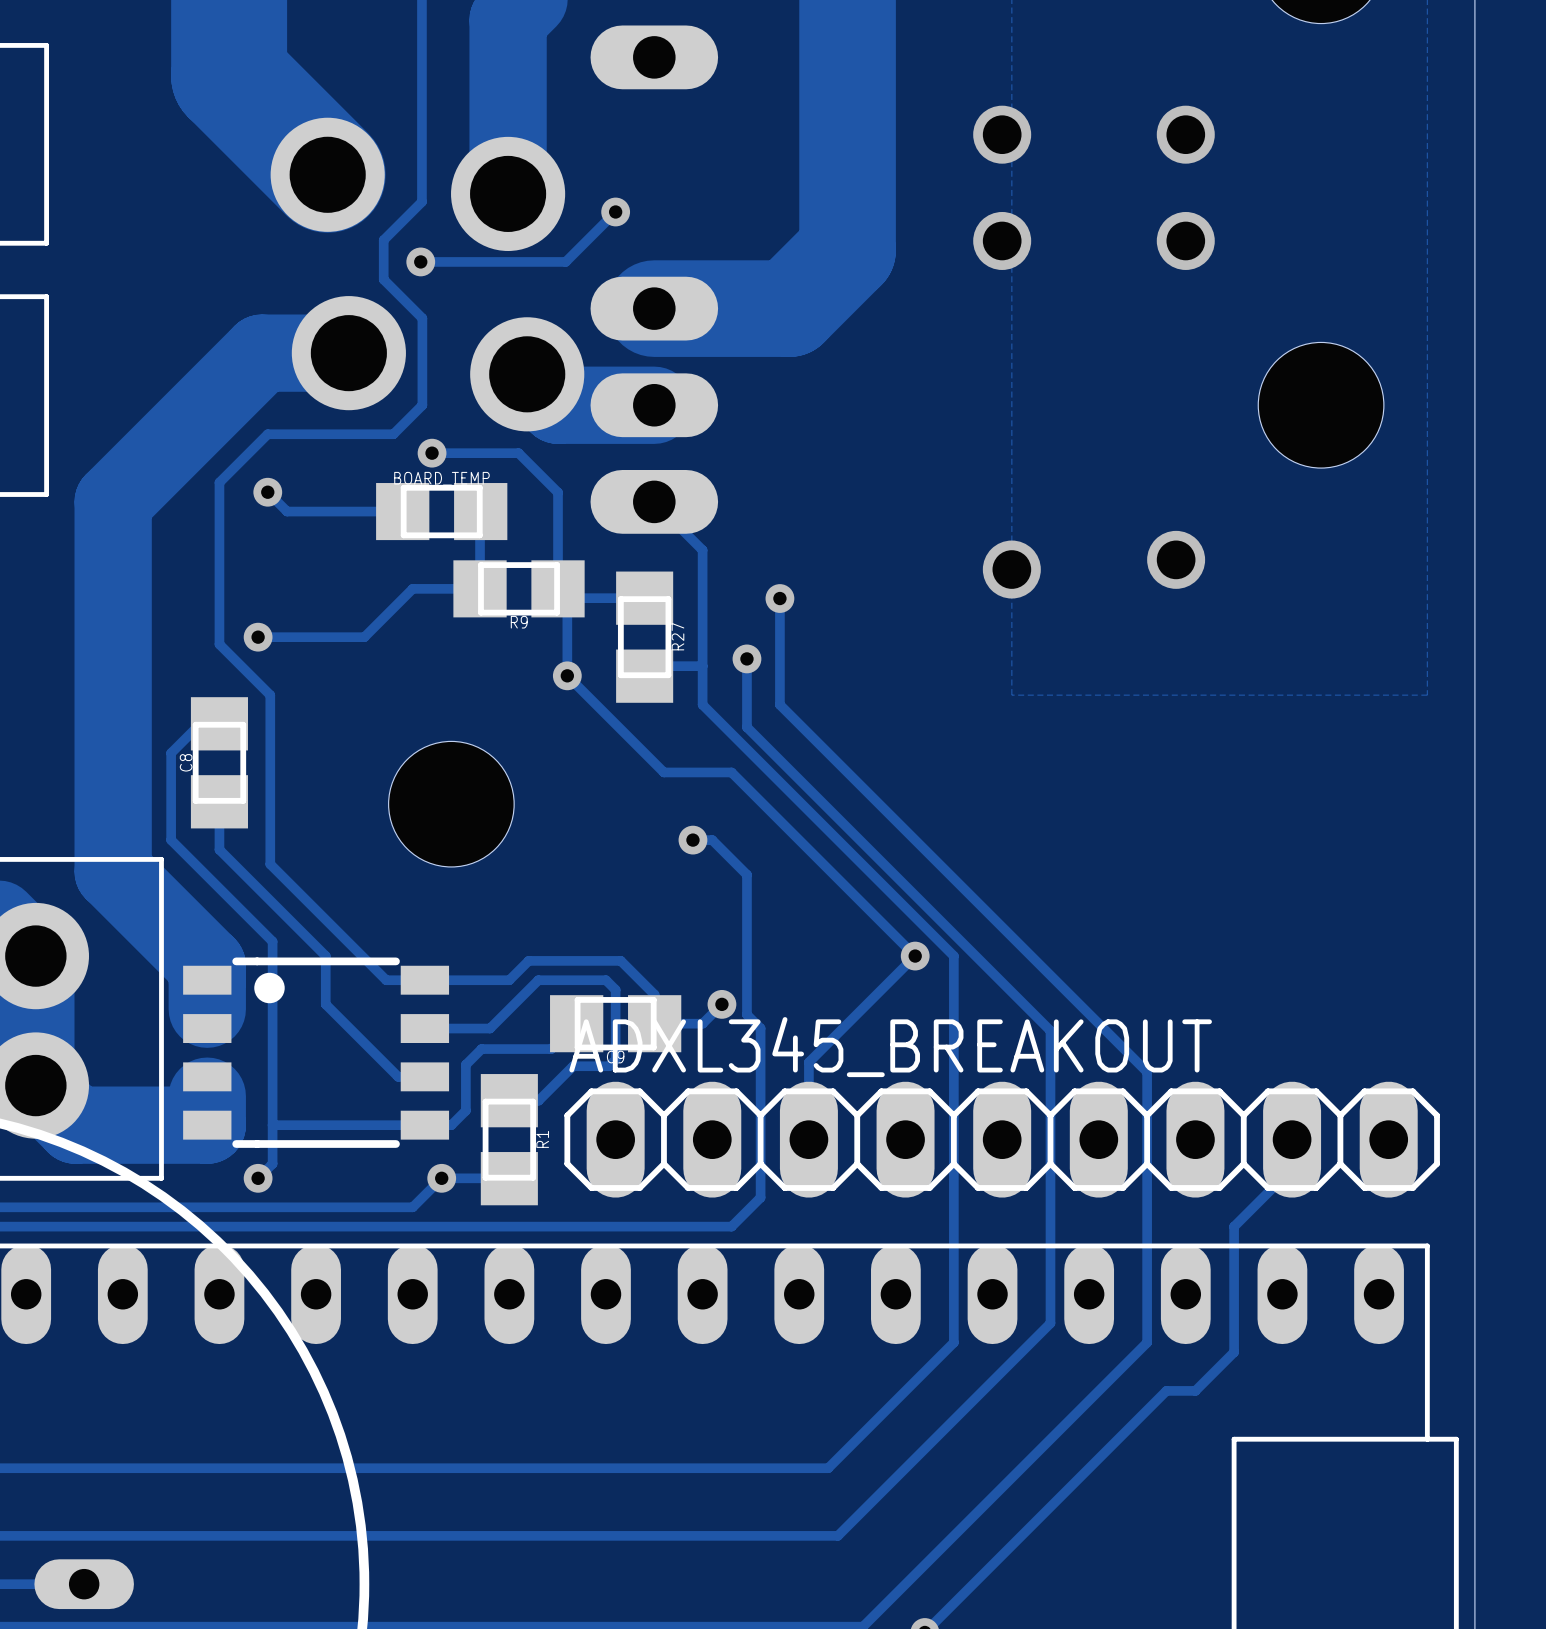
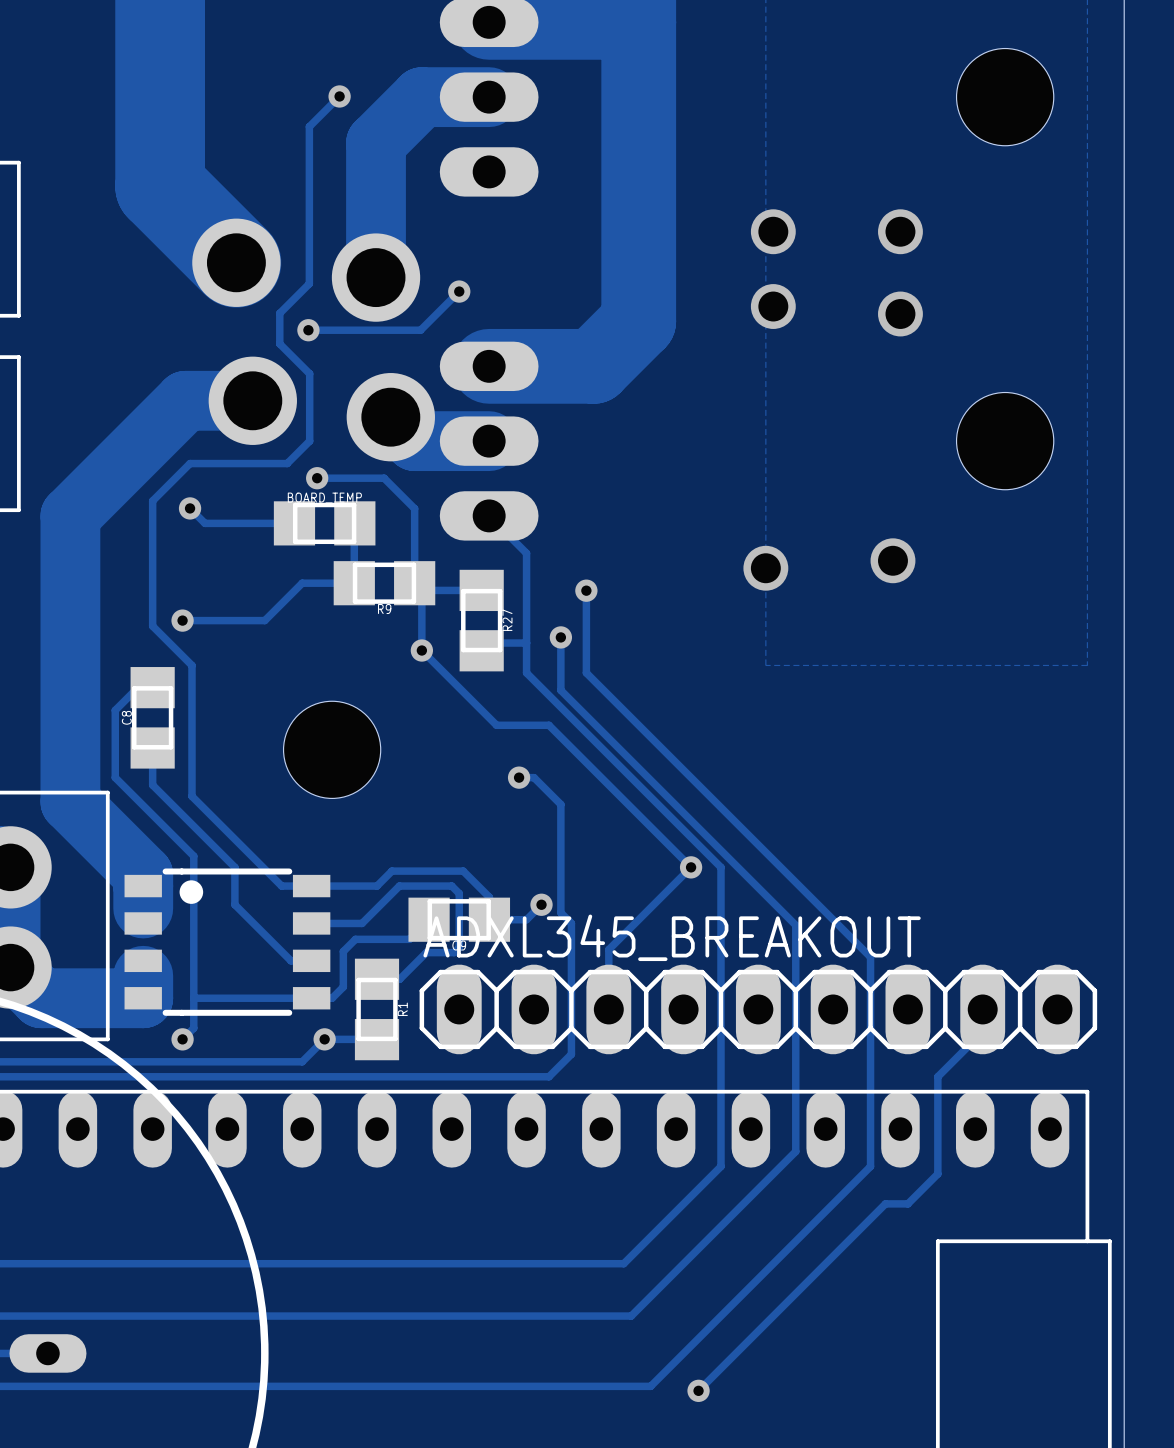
via position: (1002, 134) -> (773, 231)
via position: (1002, 240) -> (773, 306)

